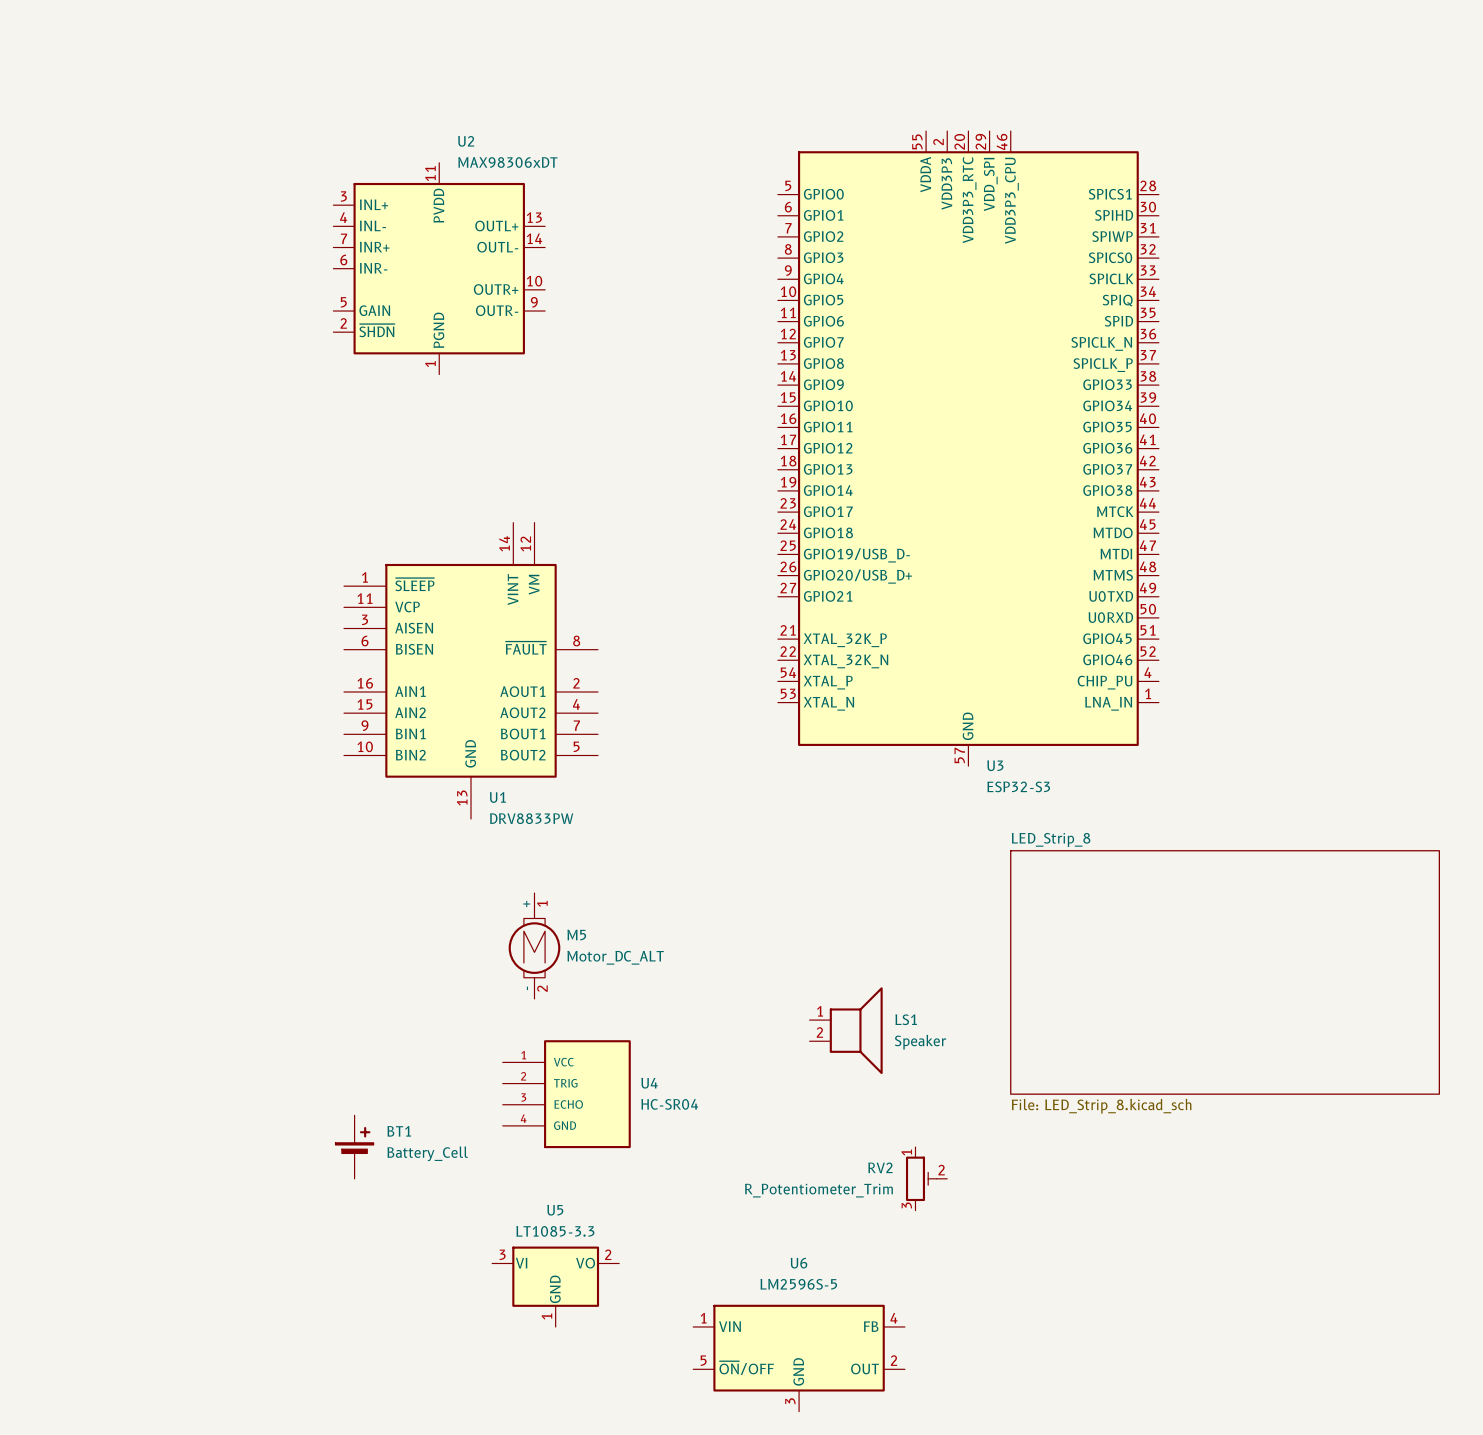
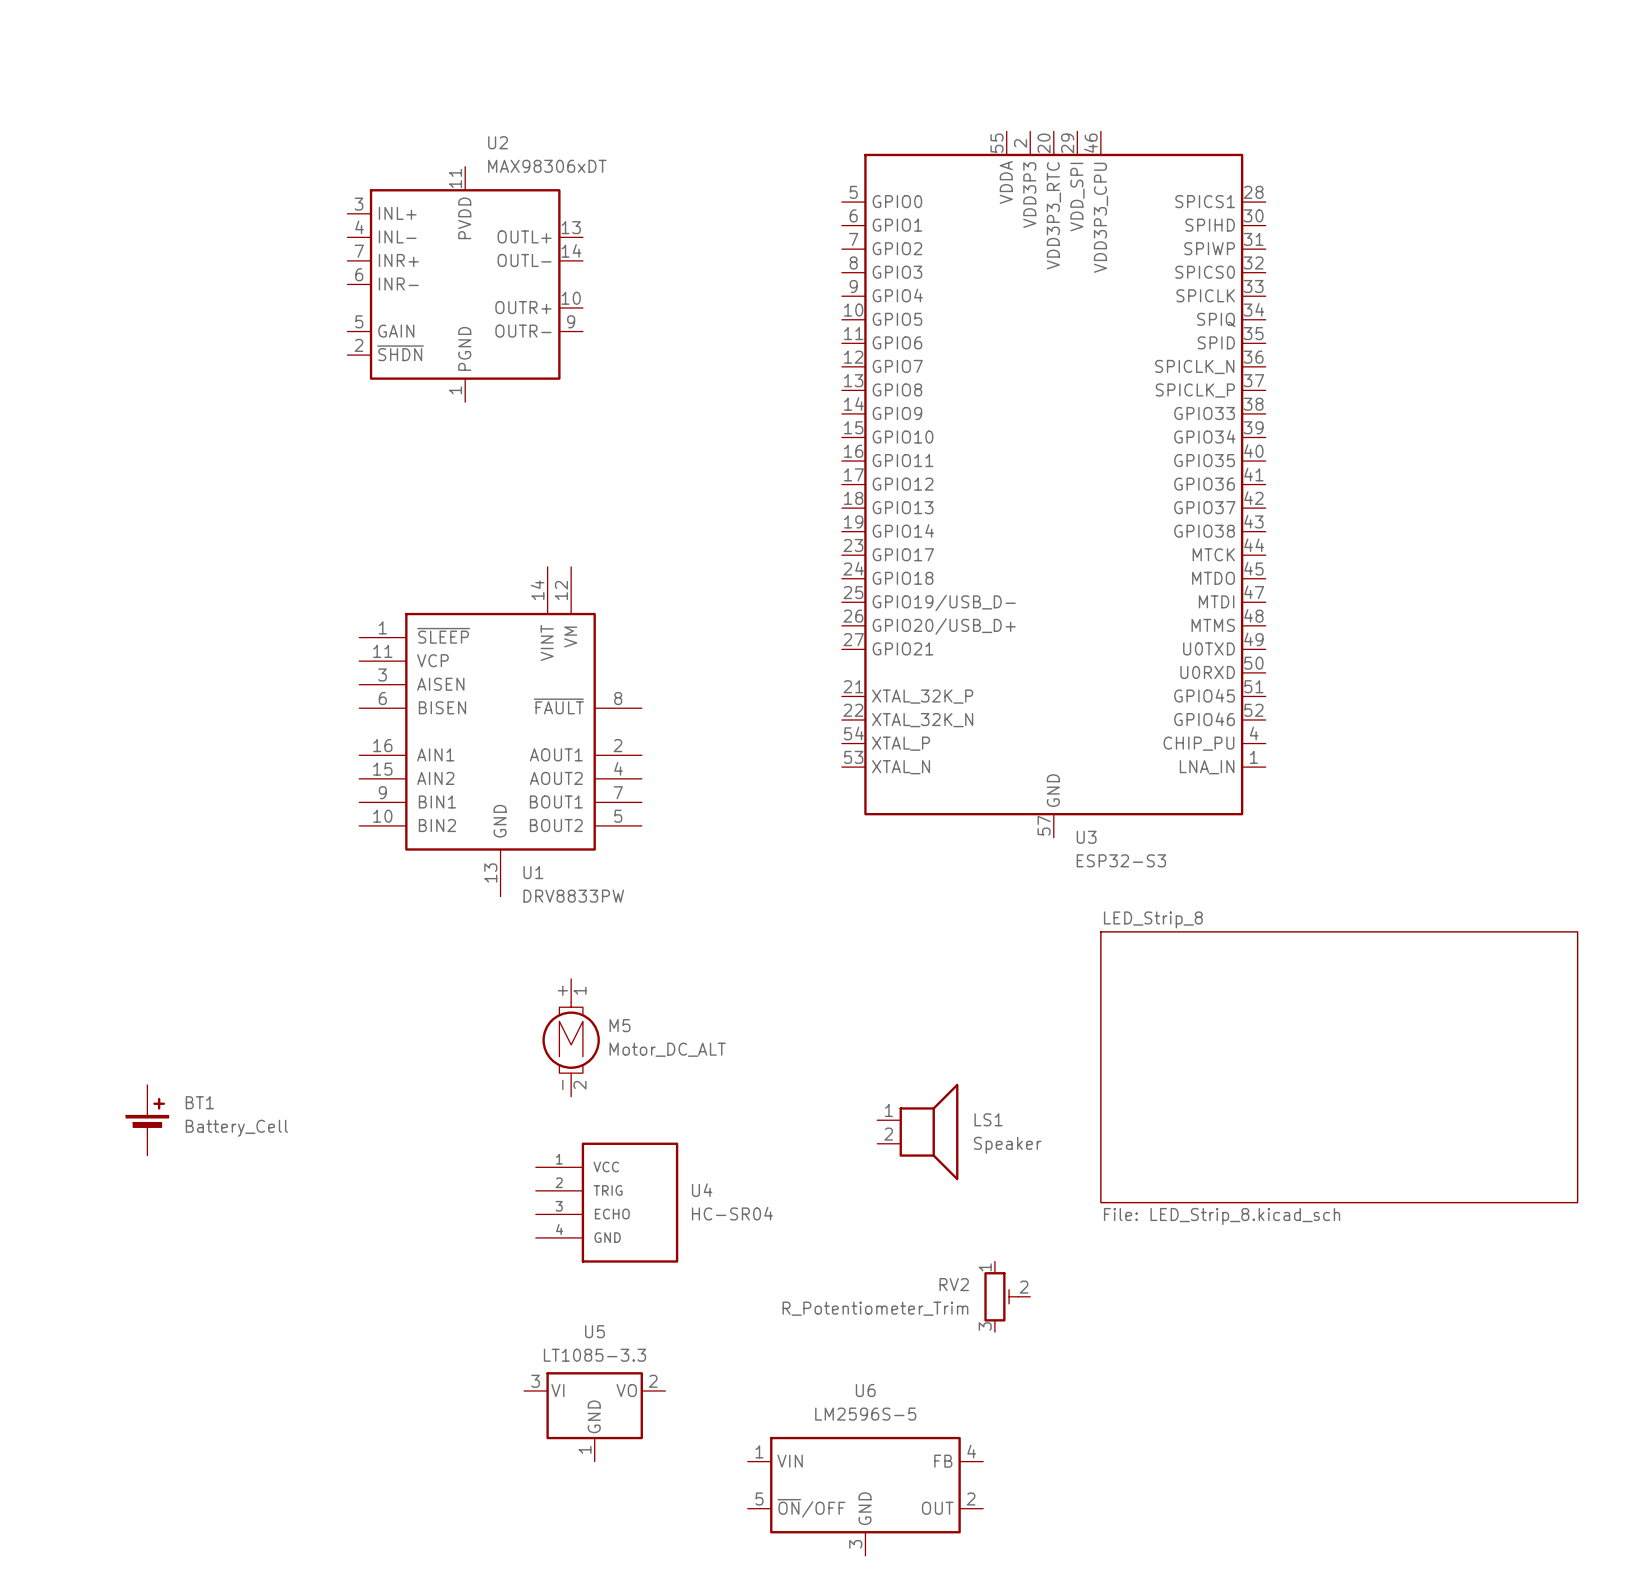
BT1 position: (354, 1147) -> (147, 1120)

